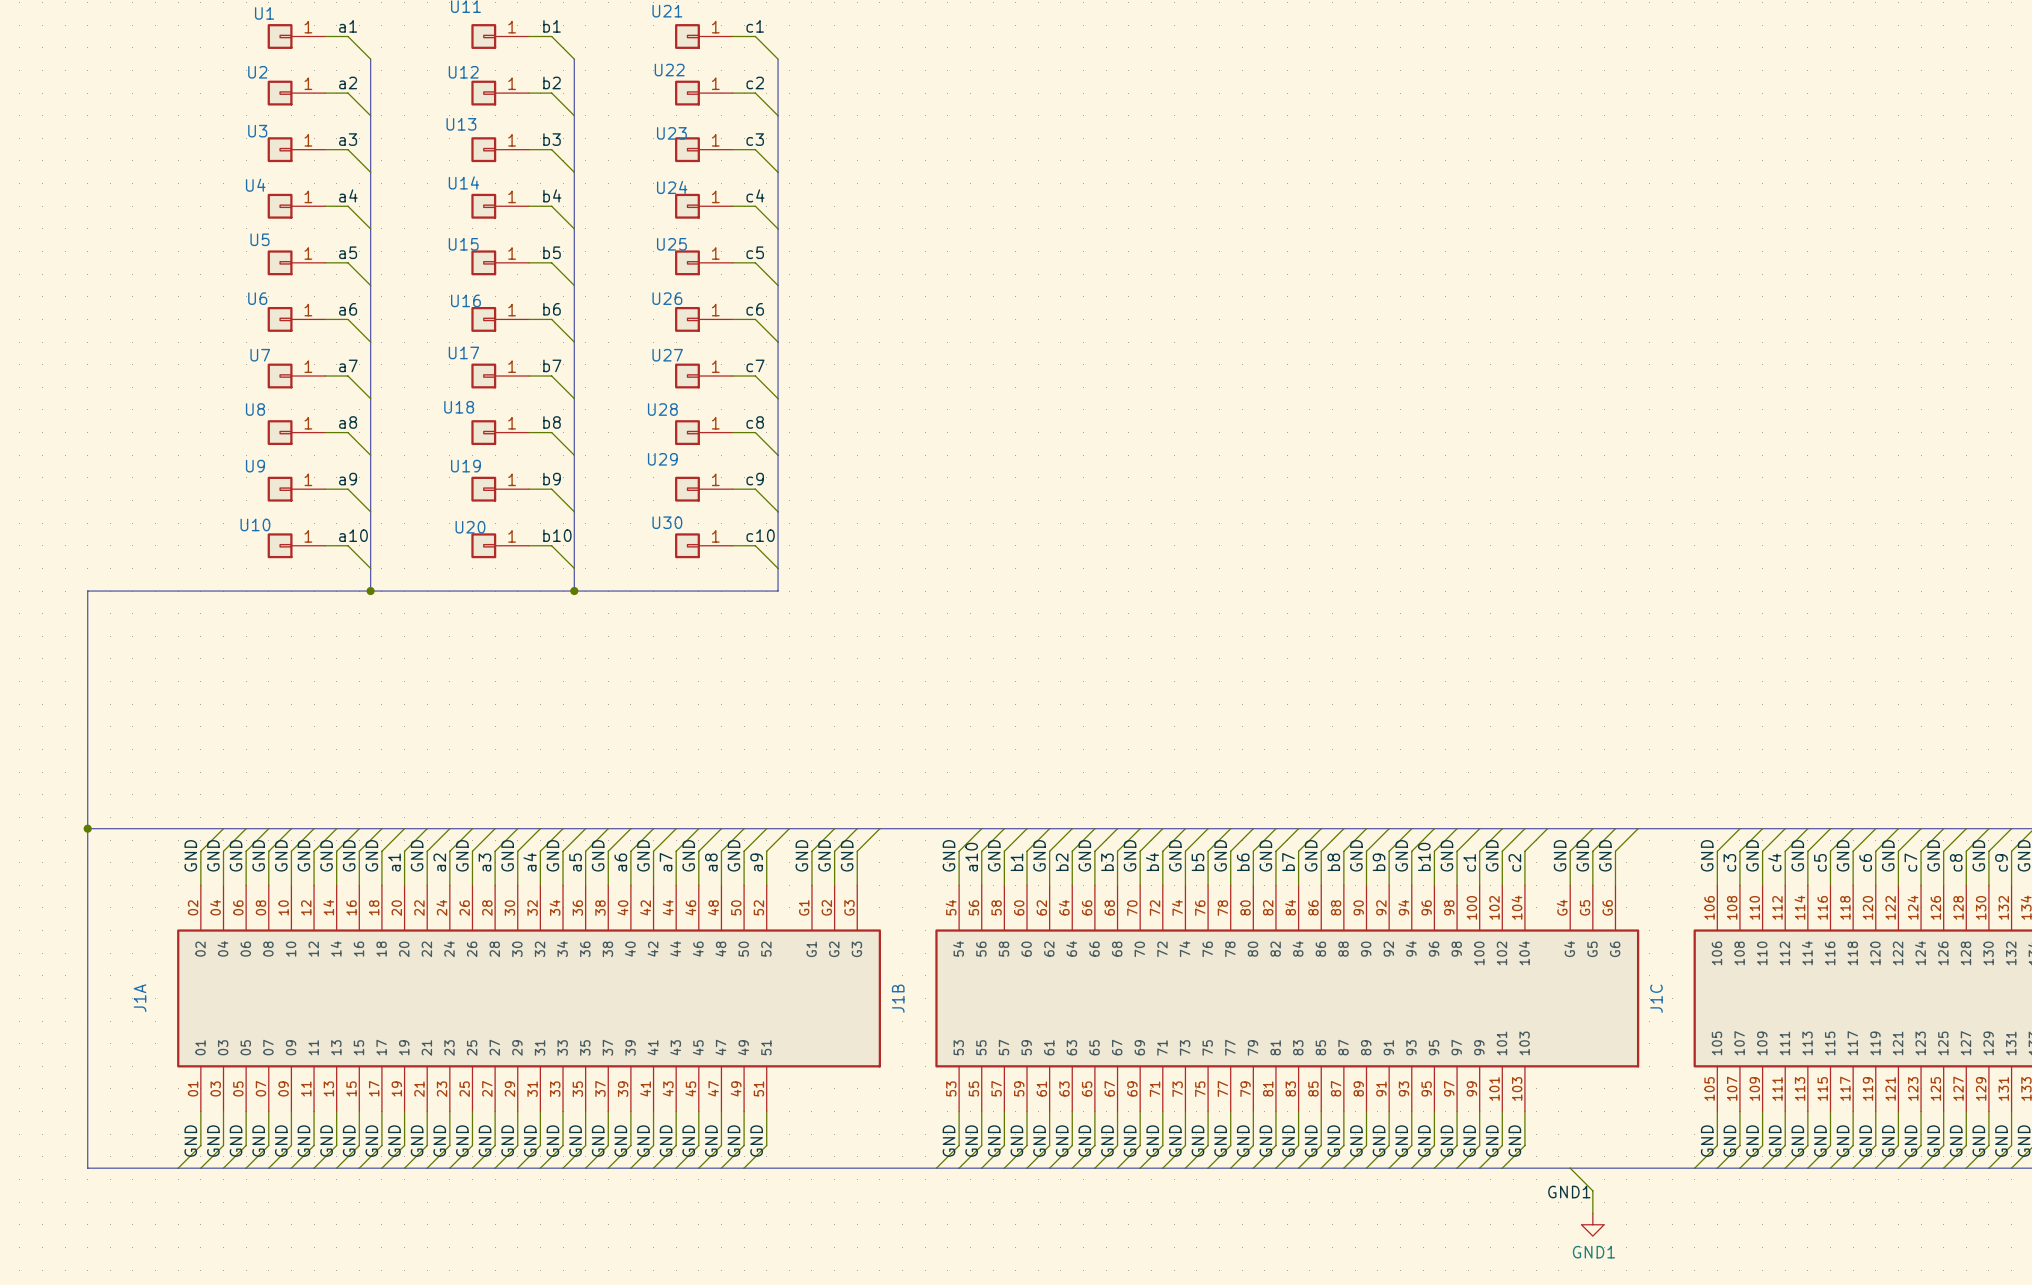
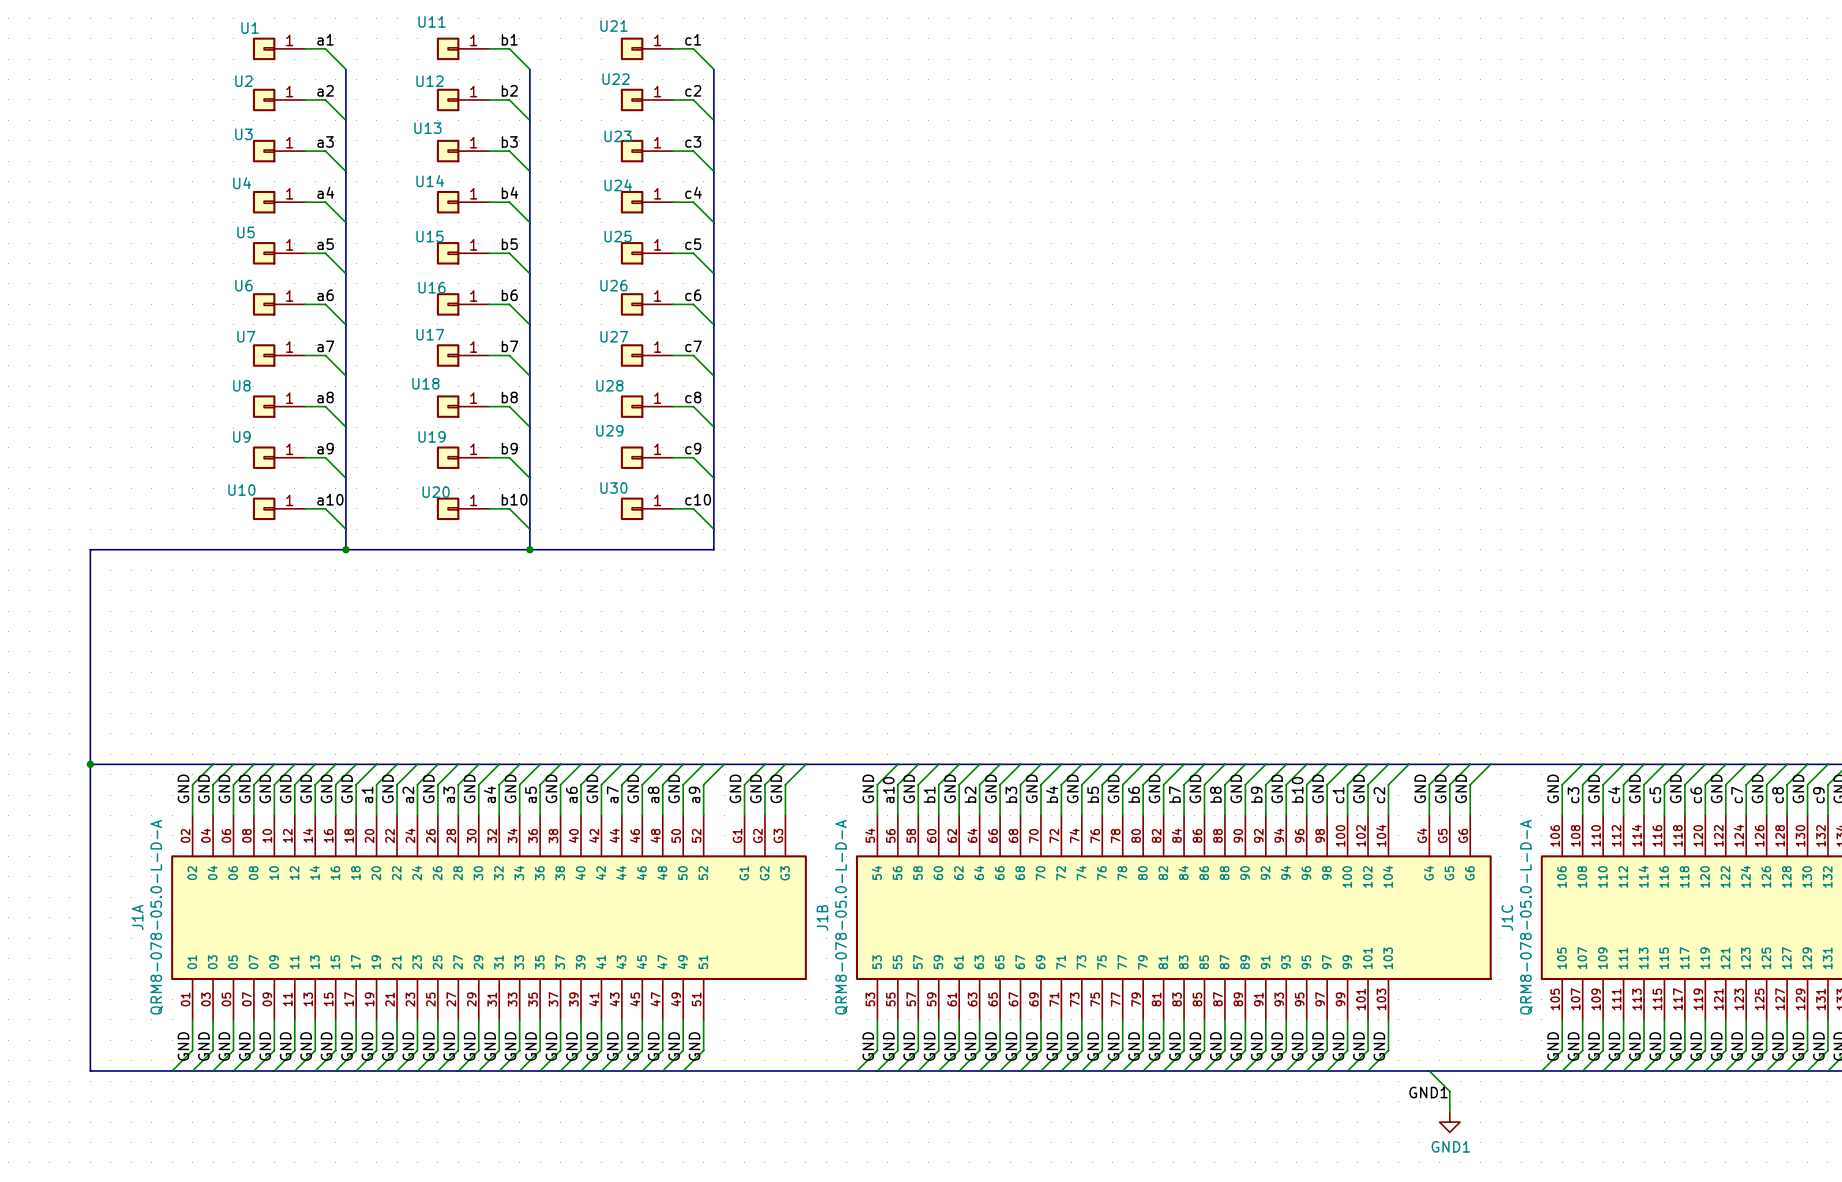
J1A value: none -> QRM8-078-05.0-L-D-A (156, 917)
J1B value: none -> QRM8-078-05.0-L-D-A (841, 917)
J1C value: none -> QRM8-078-05.0-L-D-A (1526, 917)

